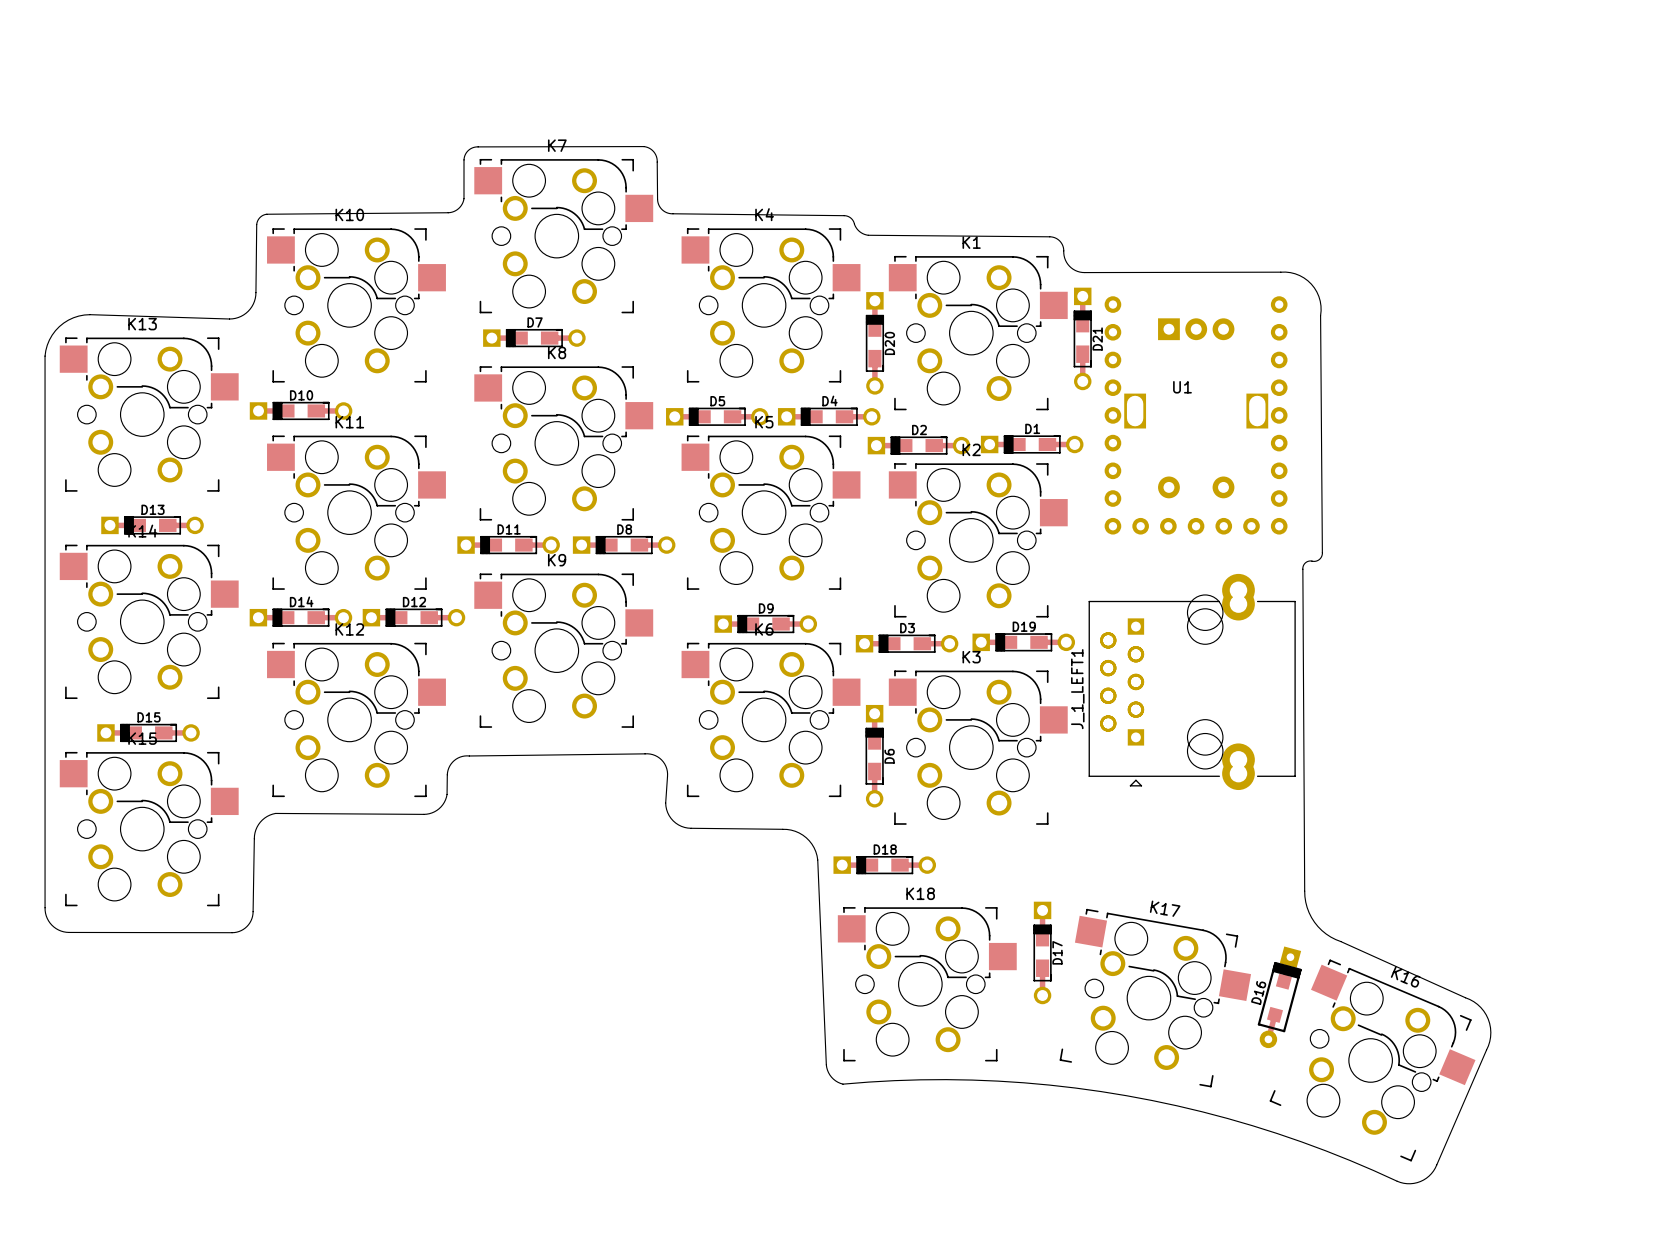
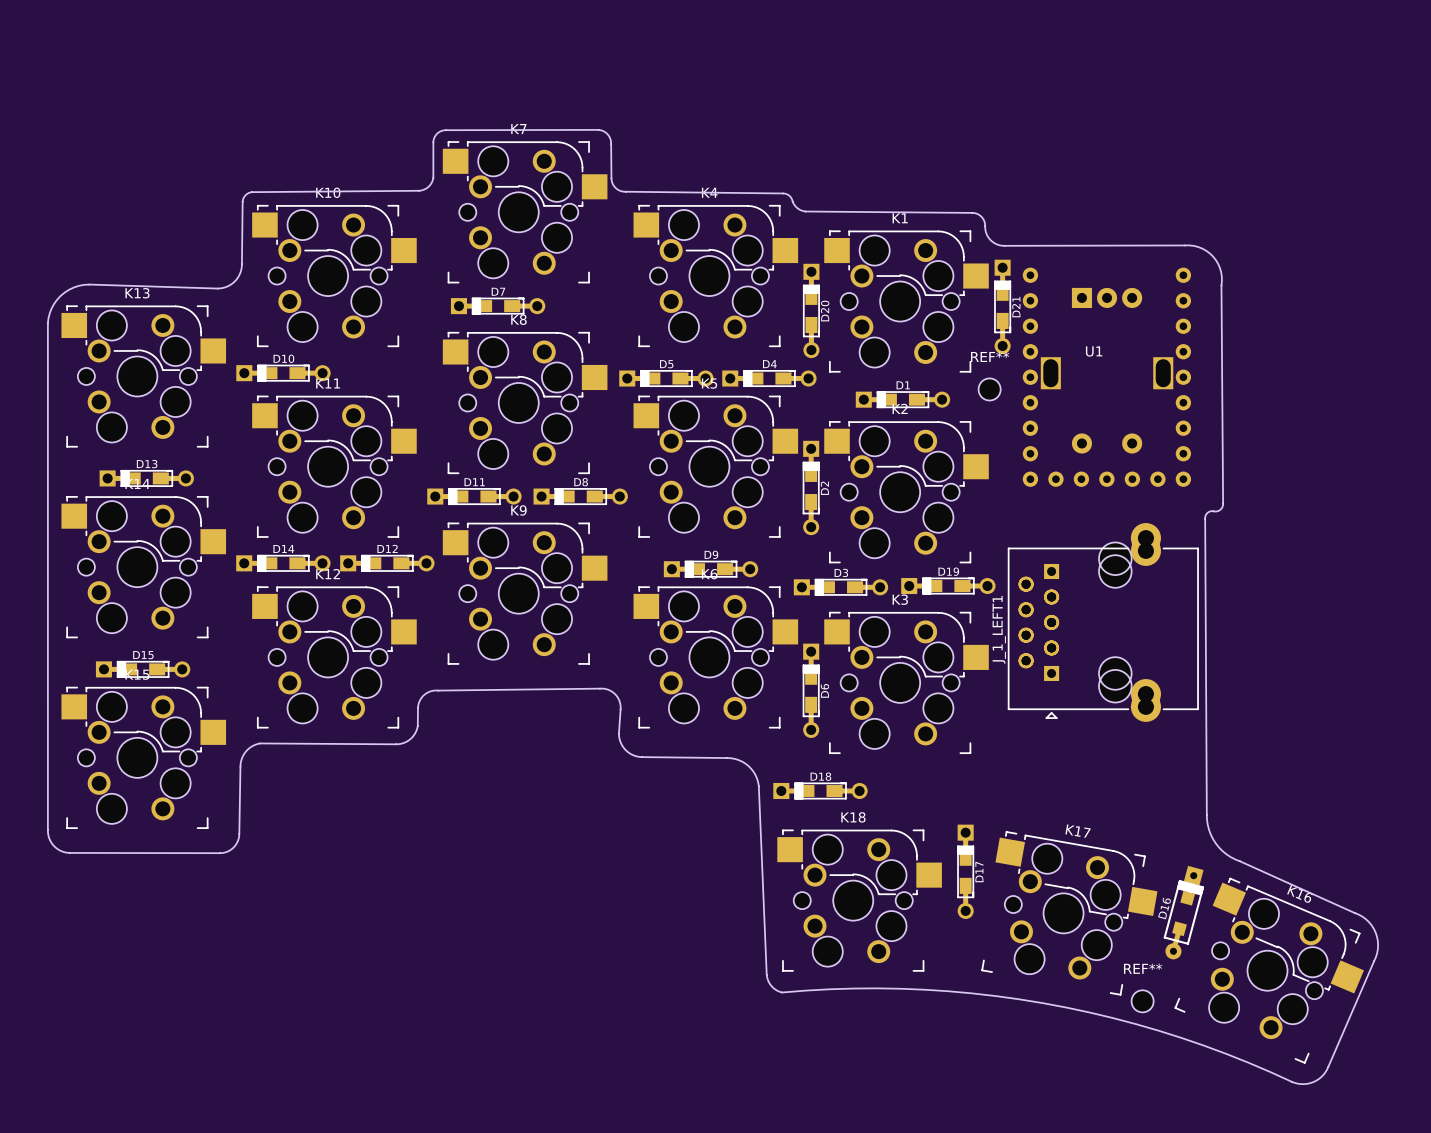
REF**: none -> (989, 389)
D1 position: (1032, 444) -> (902, 399)
D2 rotation: 0° (918, 445) -> 90° clockwise (811, 487)
D2 position: (918, 445) -> (811, 487)
REF**: none -> (1142, 1001)

